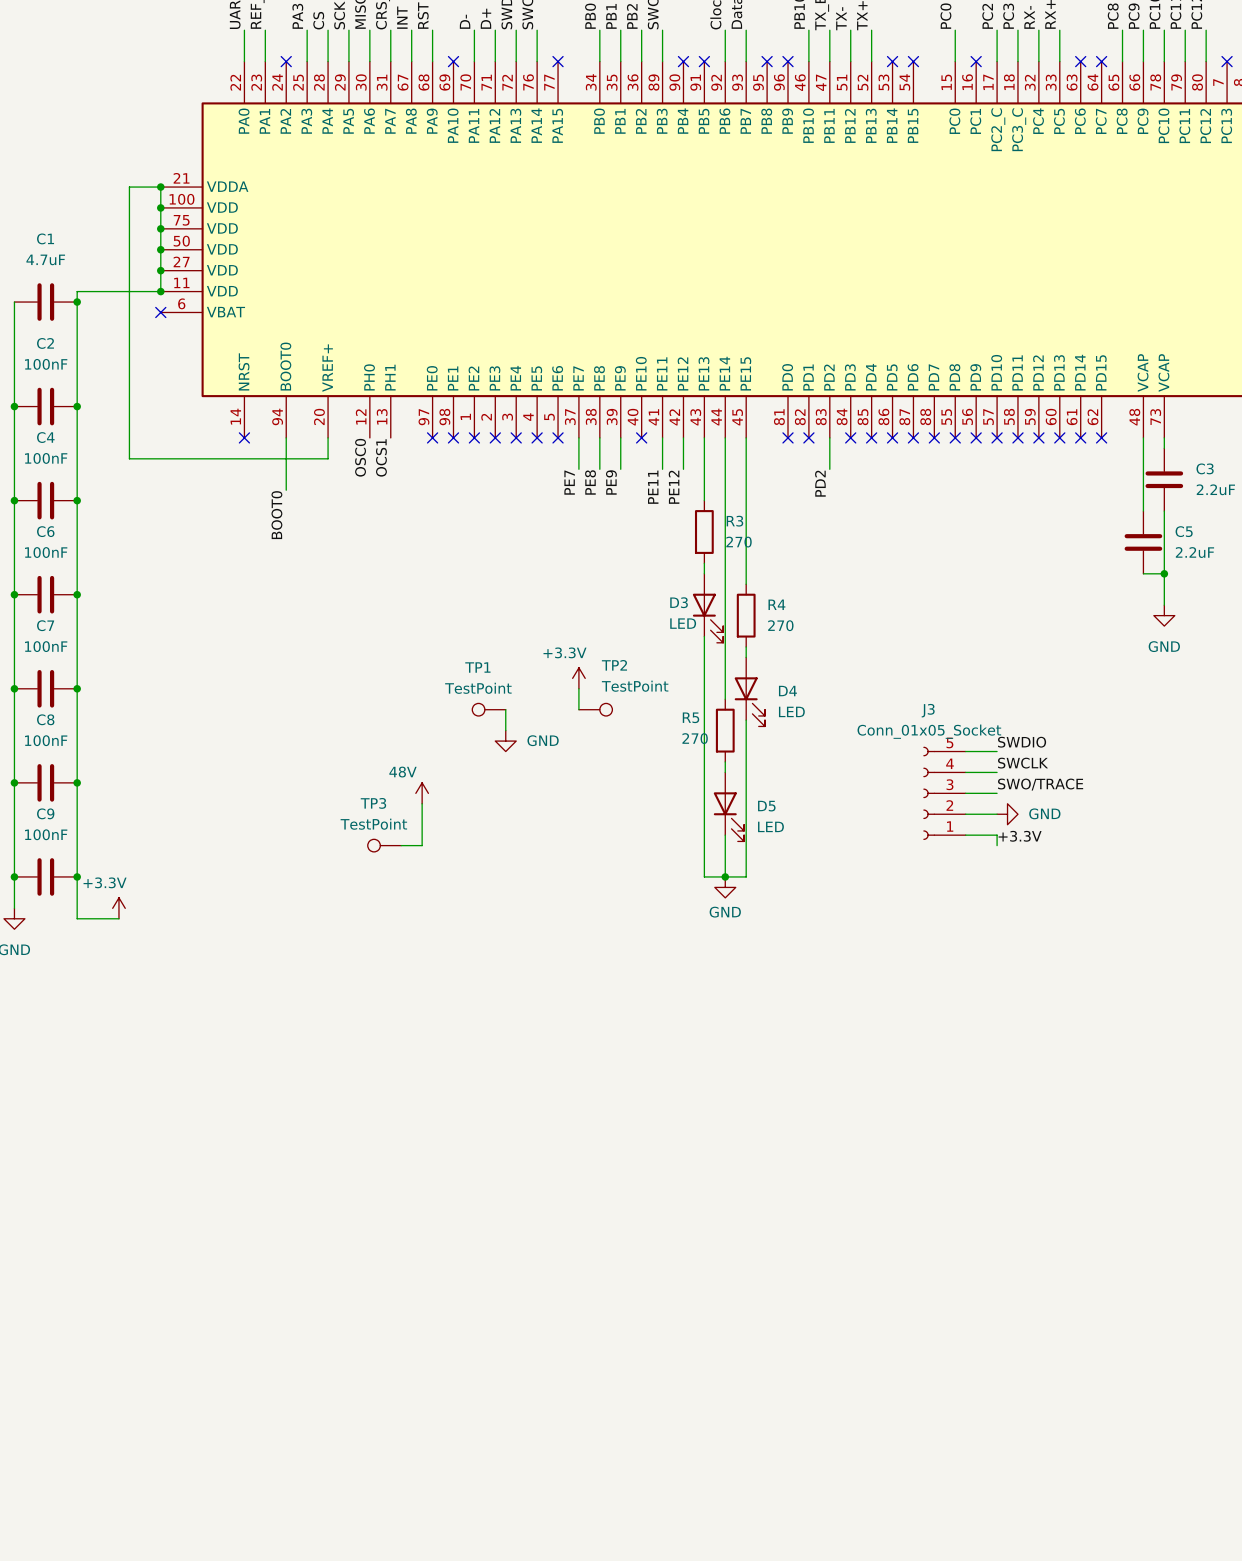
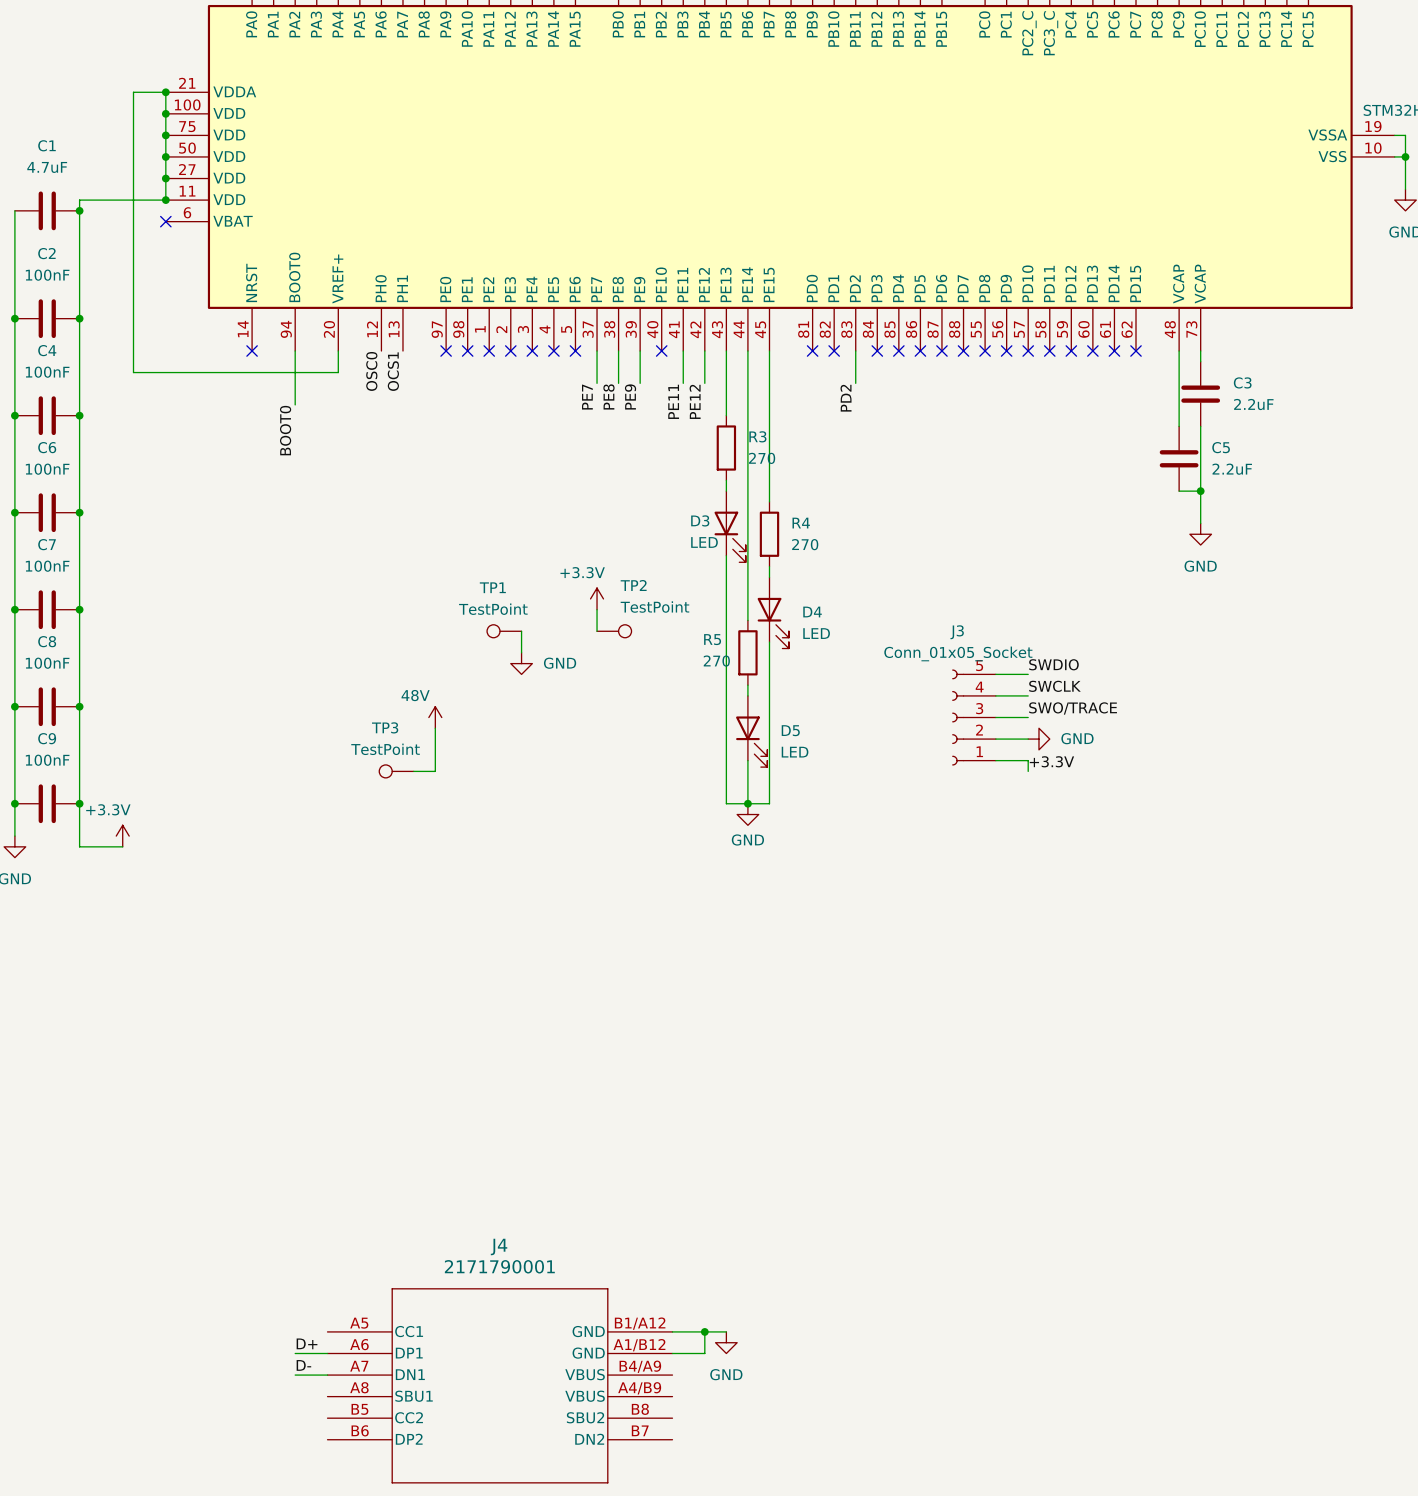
wire: none -> (672, 1331) (726, 1331)
wire: none -> (704, 1331) (704, 1353) (672, 1353)
junction: none -> (704, 1331)
power symbol: none -> GND (726, 1342)
label: none -> D+ (307, 1343)
wire: none -> (295, 1353) (327, 1353)
label: none -> D- (303, 1365)
wire: none -> (295, 1375) (327, 1375)
J4: none -> 2171790001 (500, 1385)

